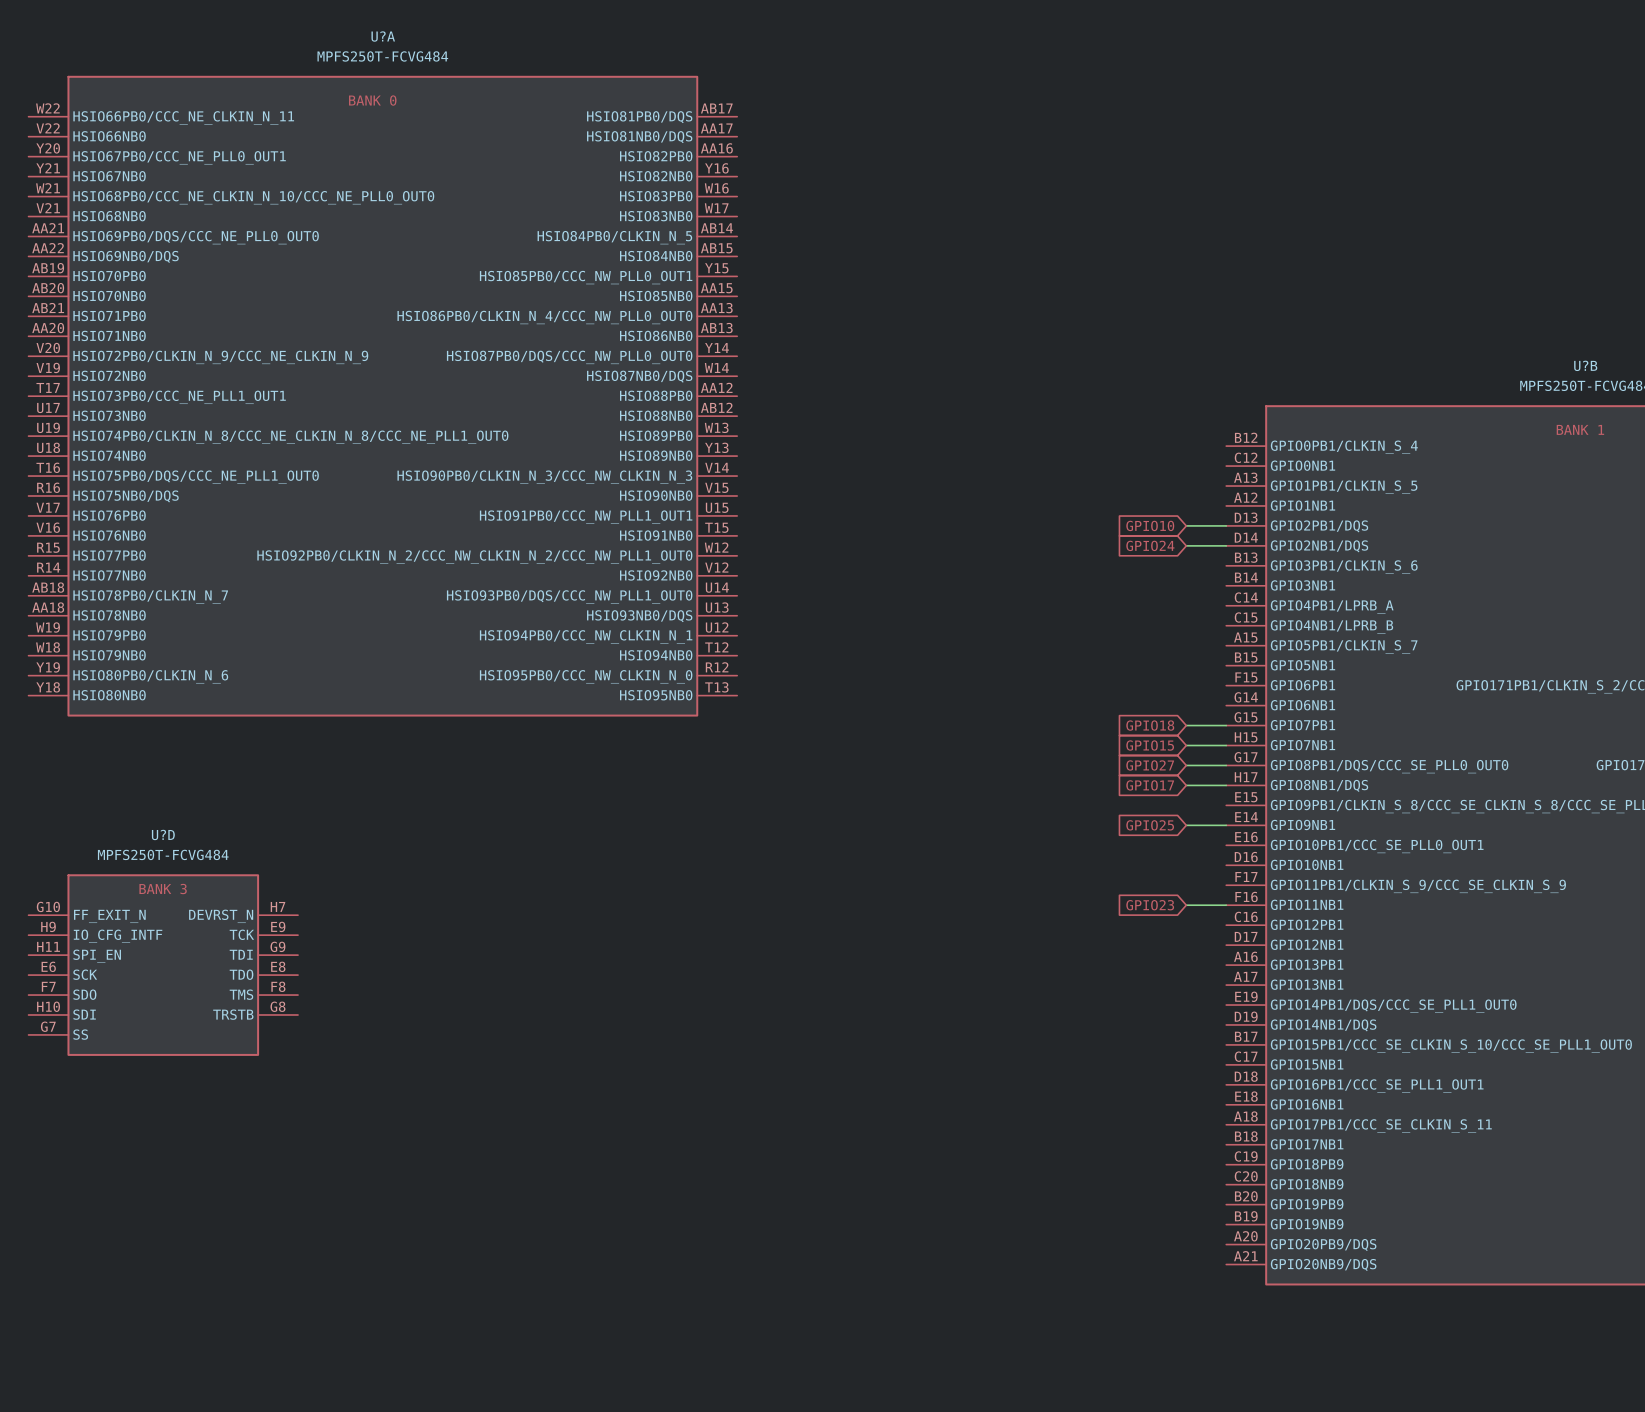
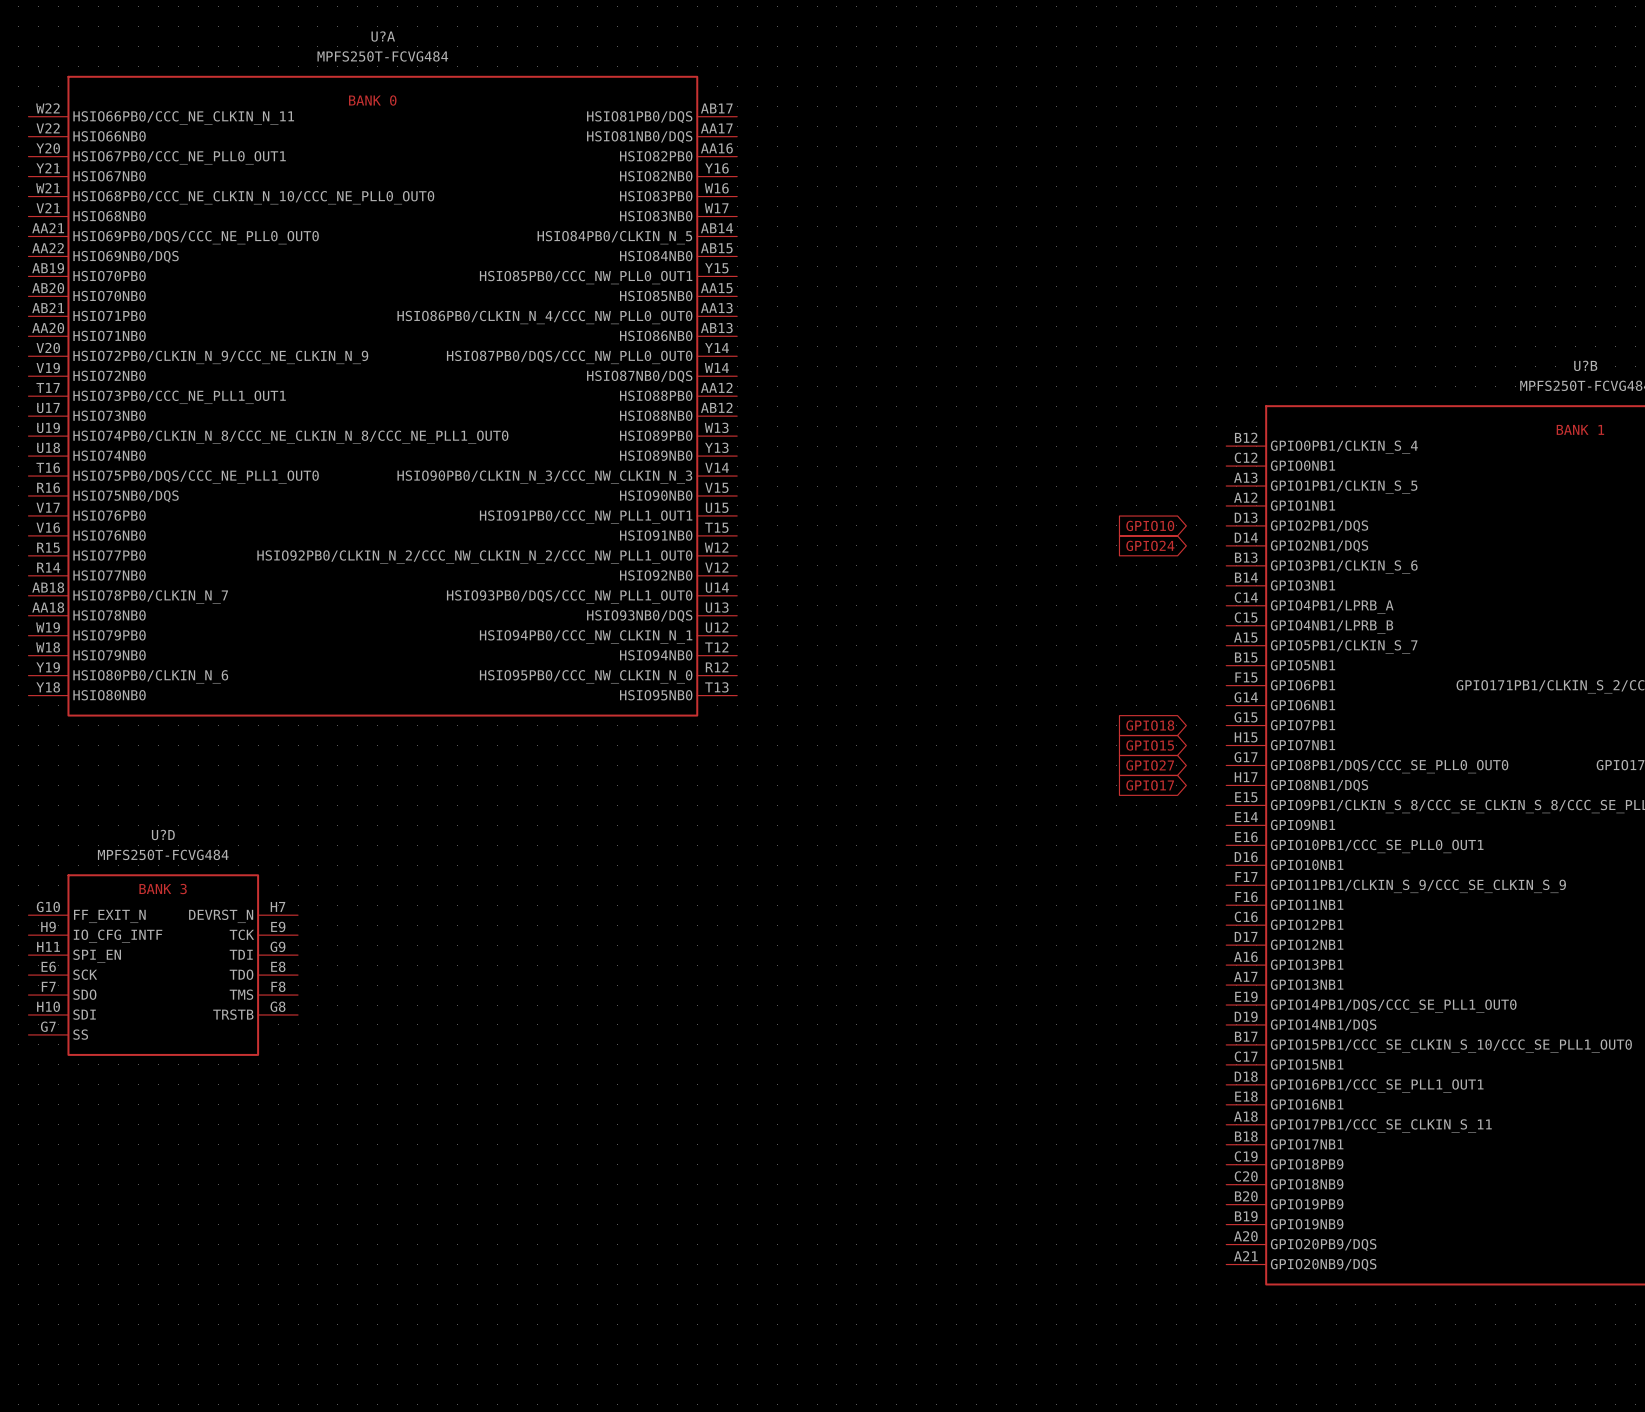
wire: (1186, 525) (1226, 525) -> none
wire: (1186, 545) (1226, 545) -> none
wire: (1186, 725) (1226, 725) -> none
wire: (1186, 745) (1226, 745) -> none
wire: (1186, 765) (1226, 765) -> none
wire: (1186, 785) (1226, 785) -> none
global label: GPIO25 (1150, 825) -> none
wire: (1186, 825) (1226, 825) -> none
global label: GPIO23 (1150, 905) -> none
wire: (1186, 905) (1226, 905) -> none

